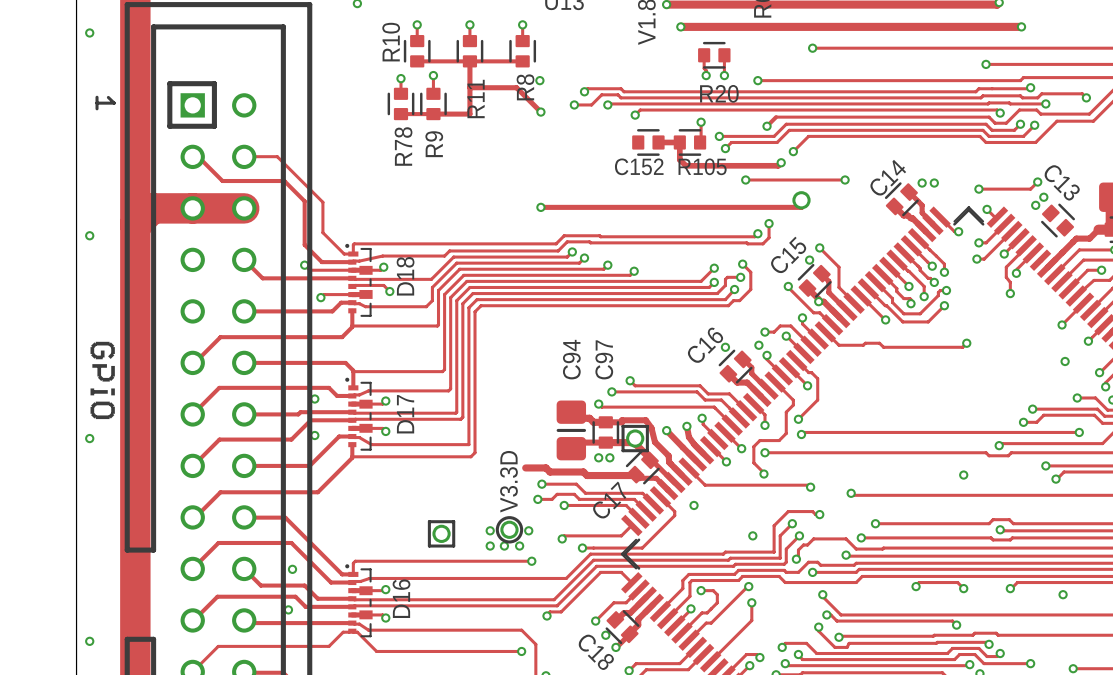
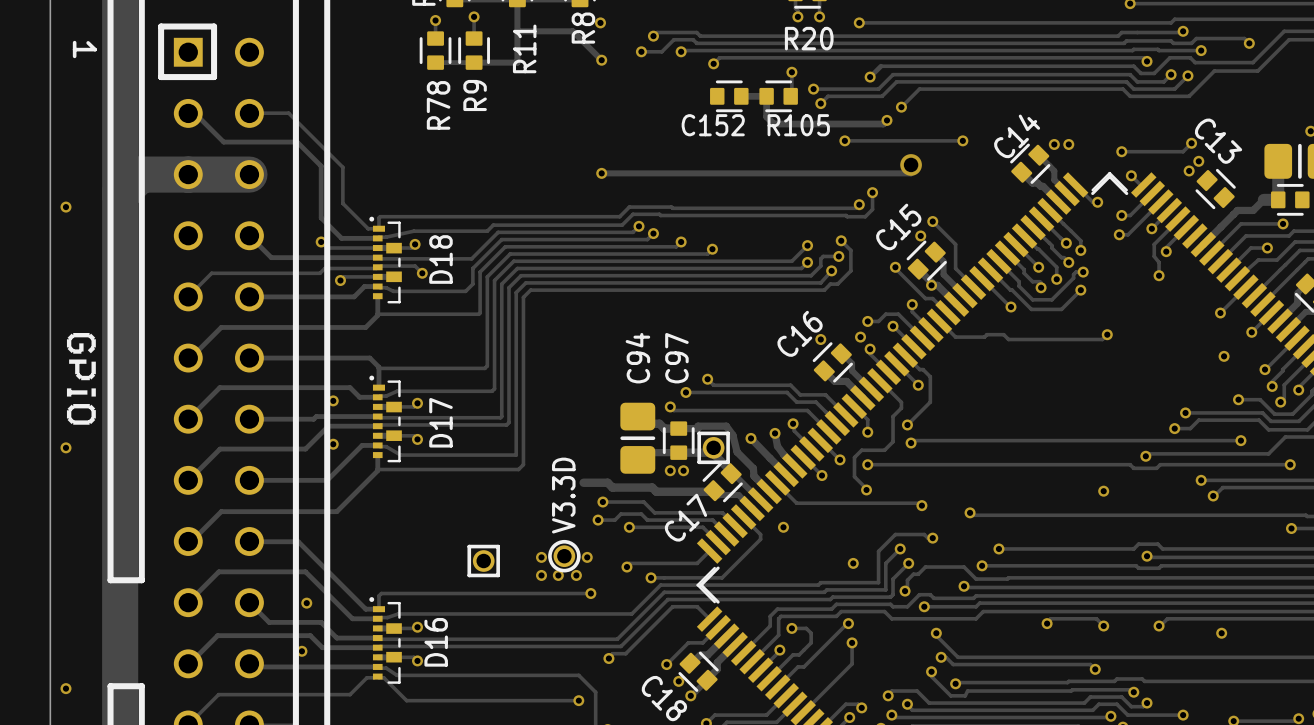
track: none -> (380, 267) (324, 268) (319, 273) (211, 273) (188, 296)

